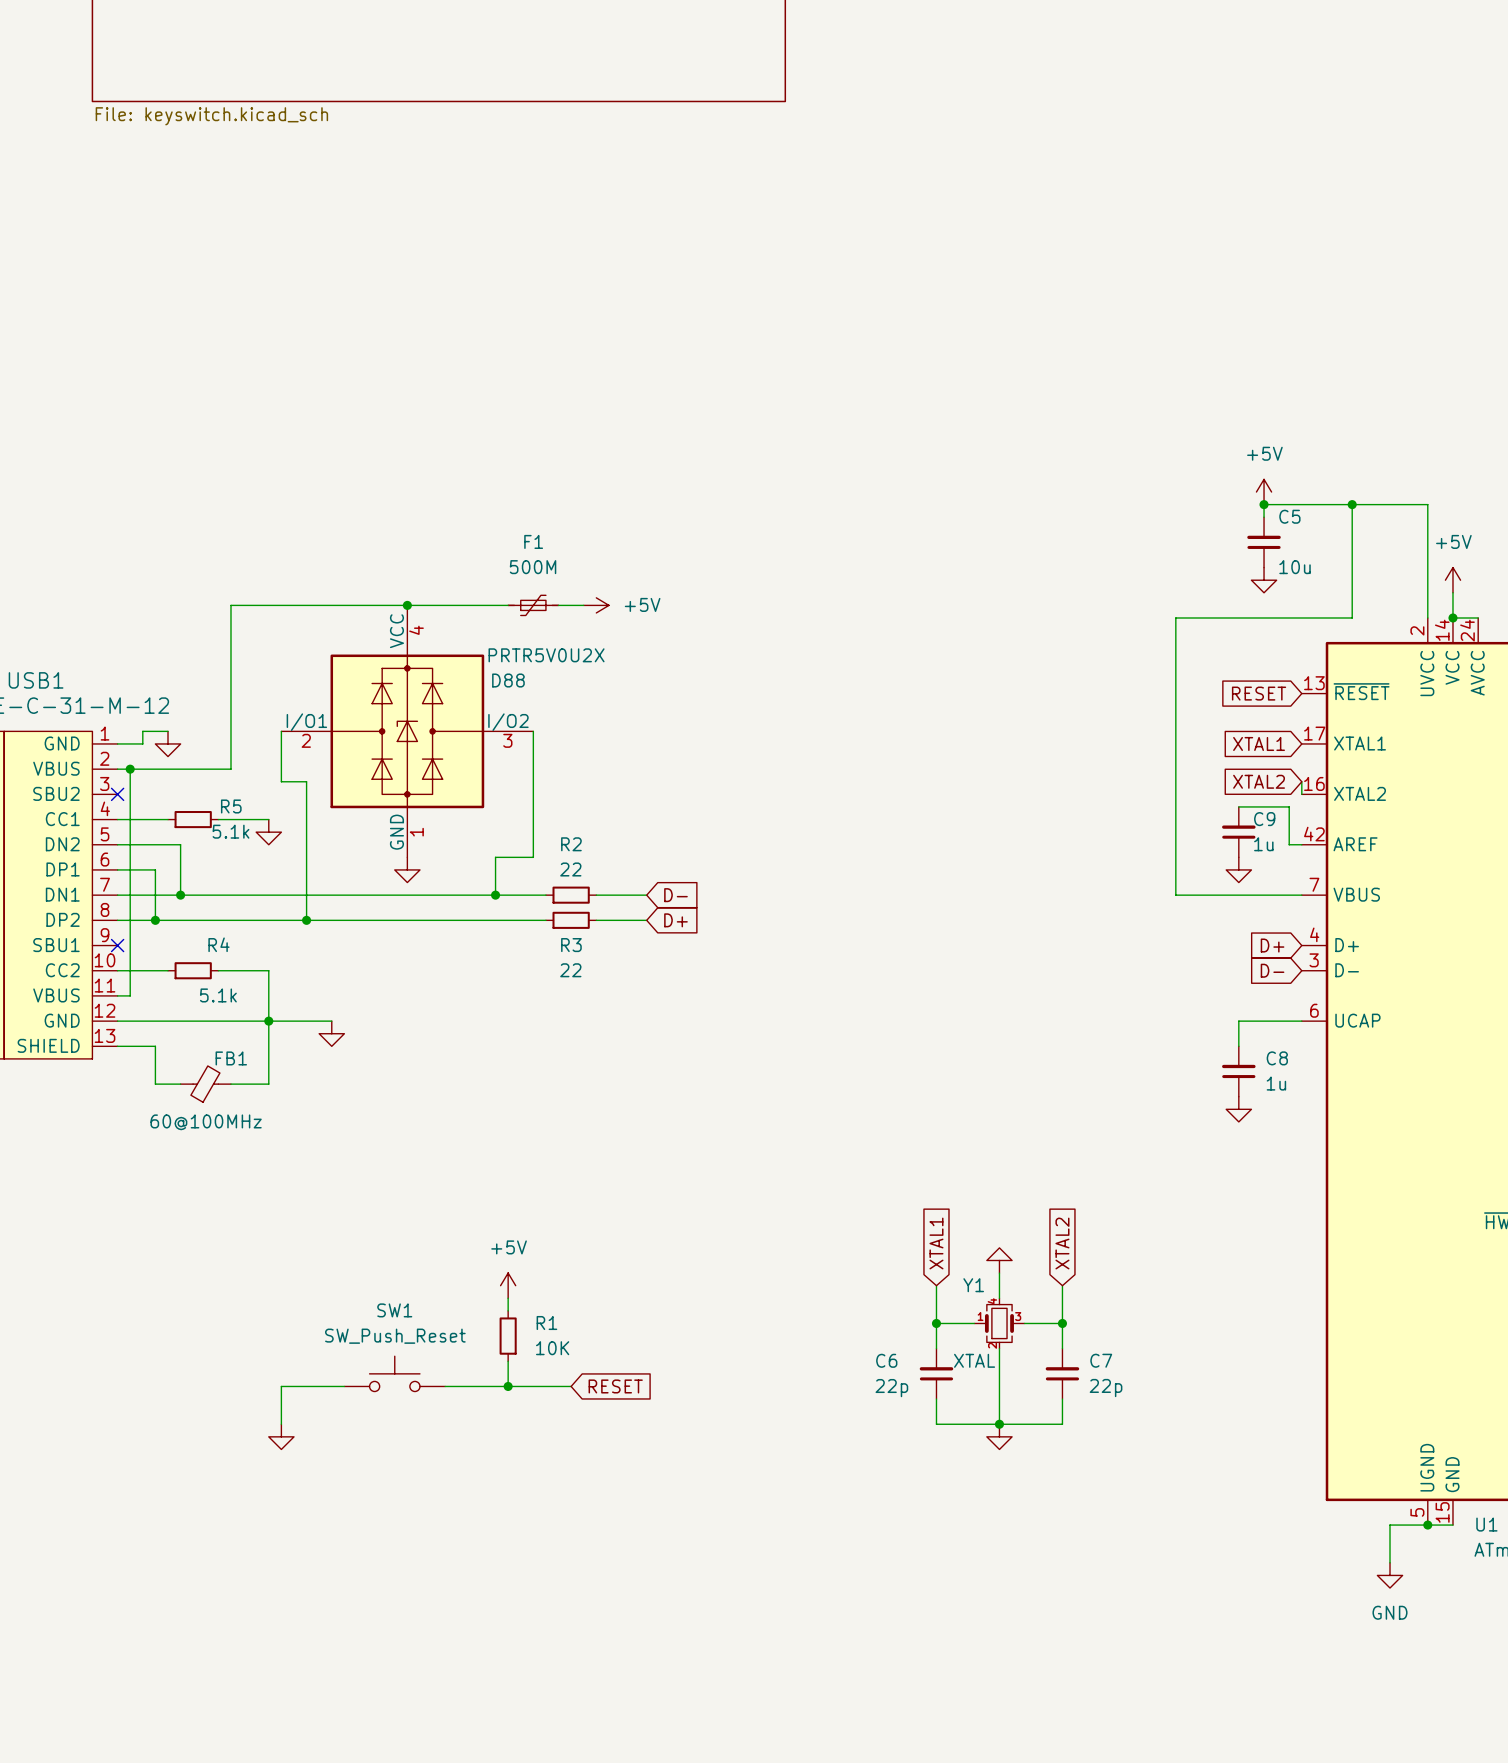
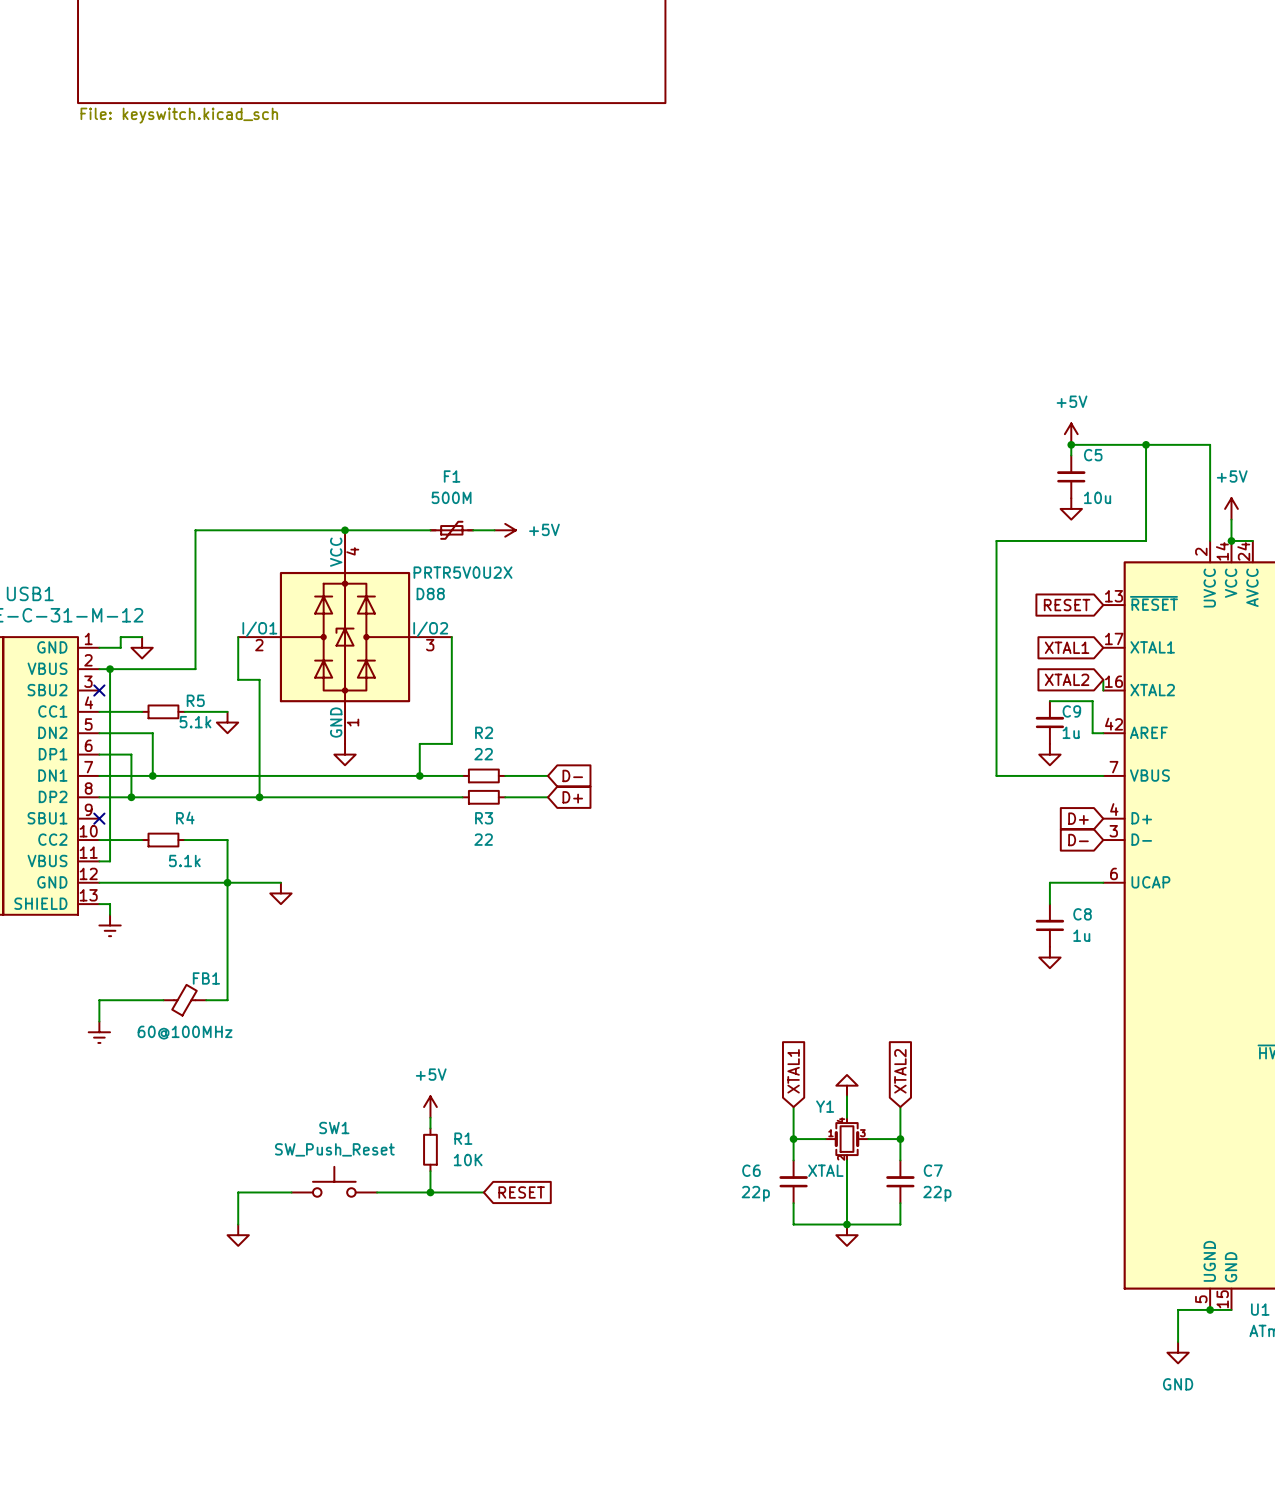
wire: (130, 1046) (155, 1046) (155, 1084) (180, 1084) -> (110, 904) (110, 914)
power symbol: none -> (110, 925)
FB1 position: (205, 1084) -> (184, 1000)
wire: (230, 1084) (268, 1084) -> (206, 1000) (227, 1000) (227, 936)
wire: none -> (163, 1000) (99, 1000) (99, 1021)
power symbol: none -> (99, 1032)

